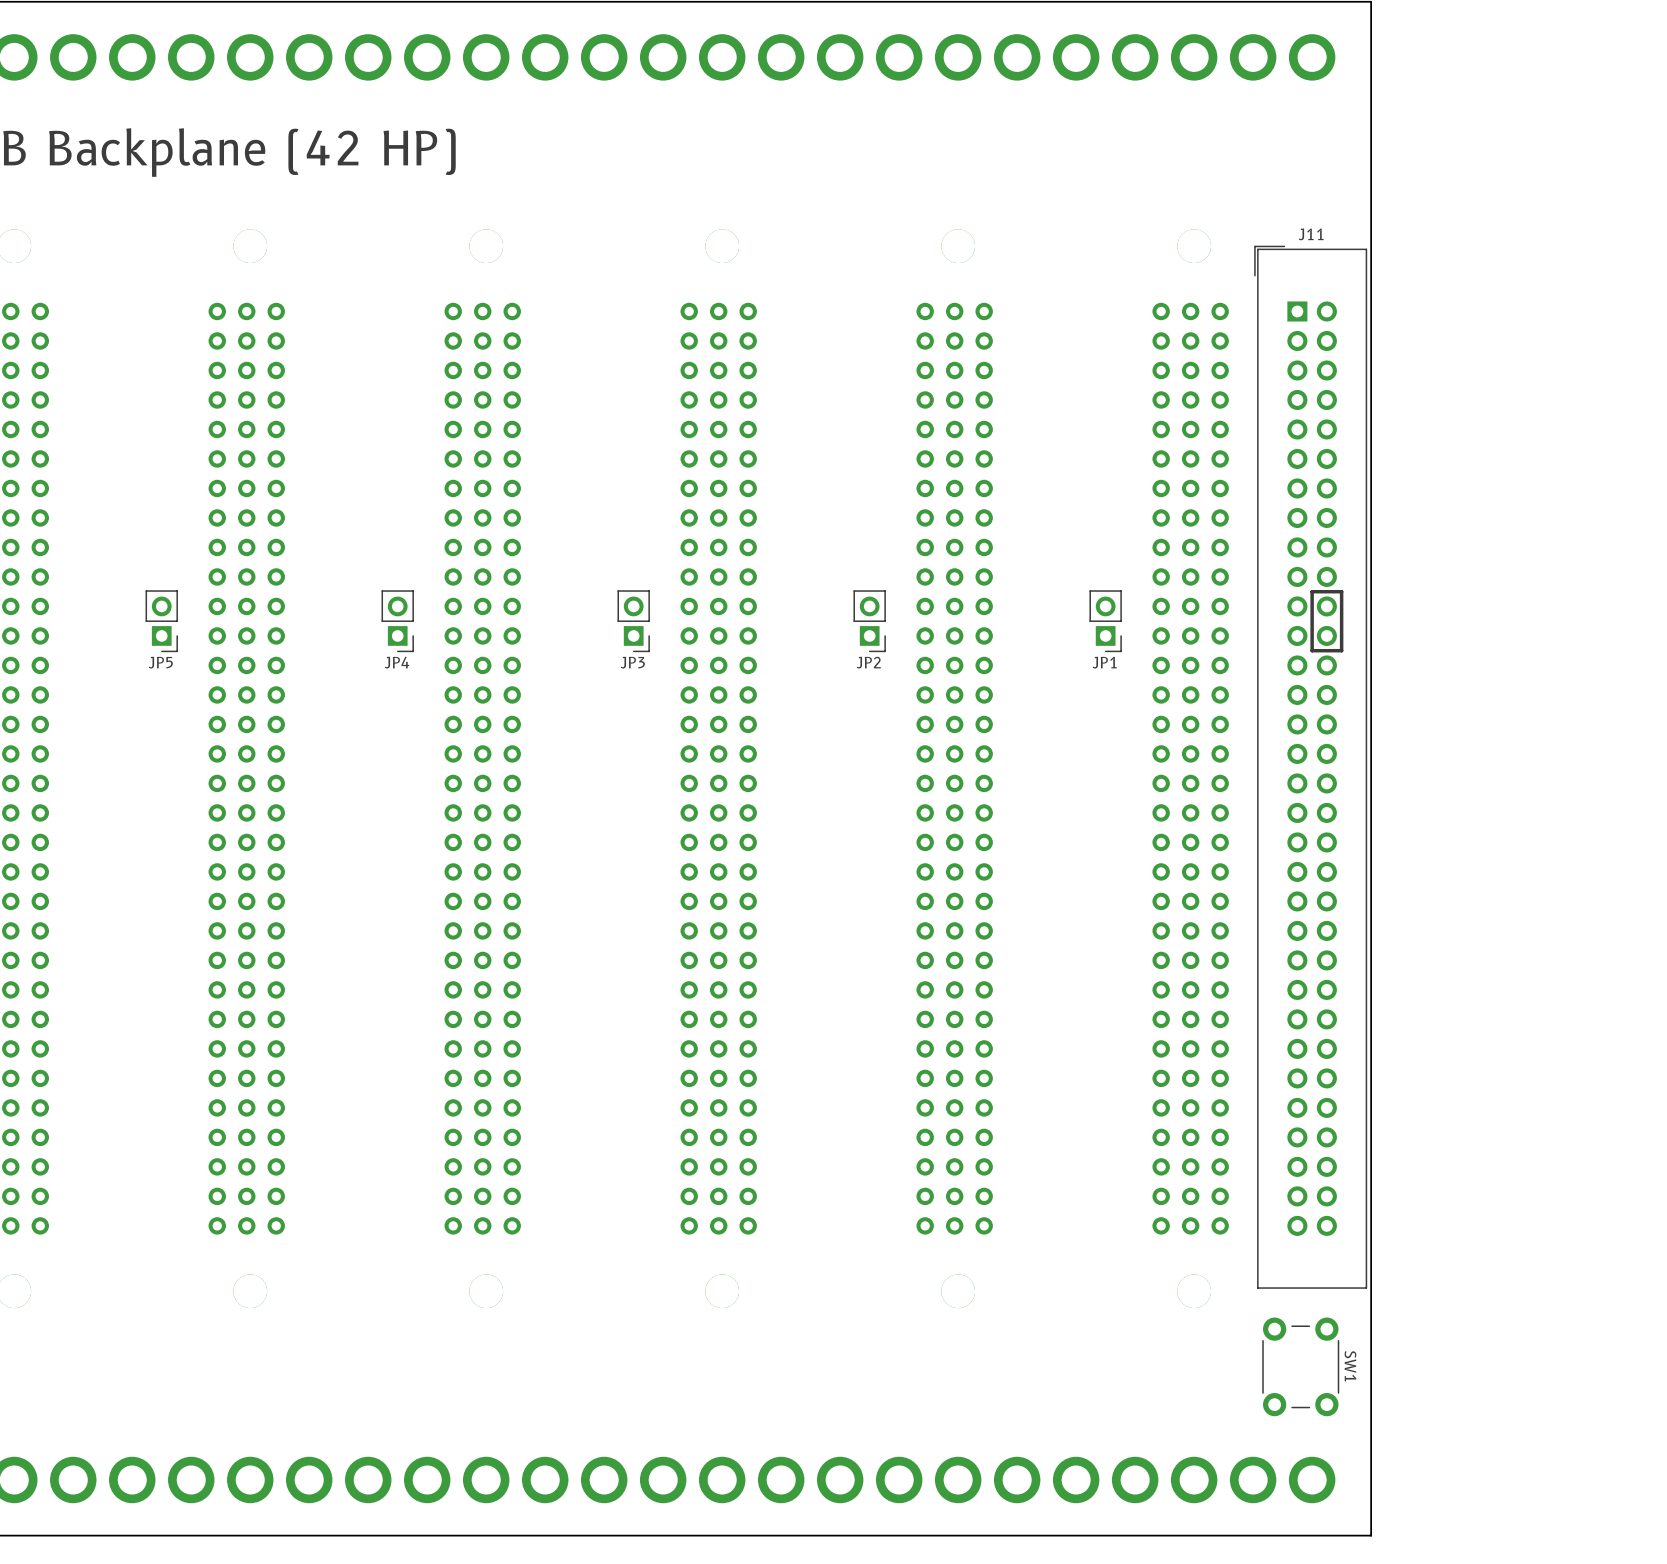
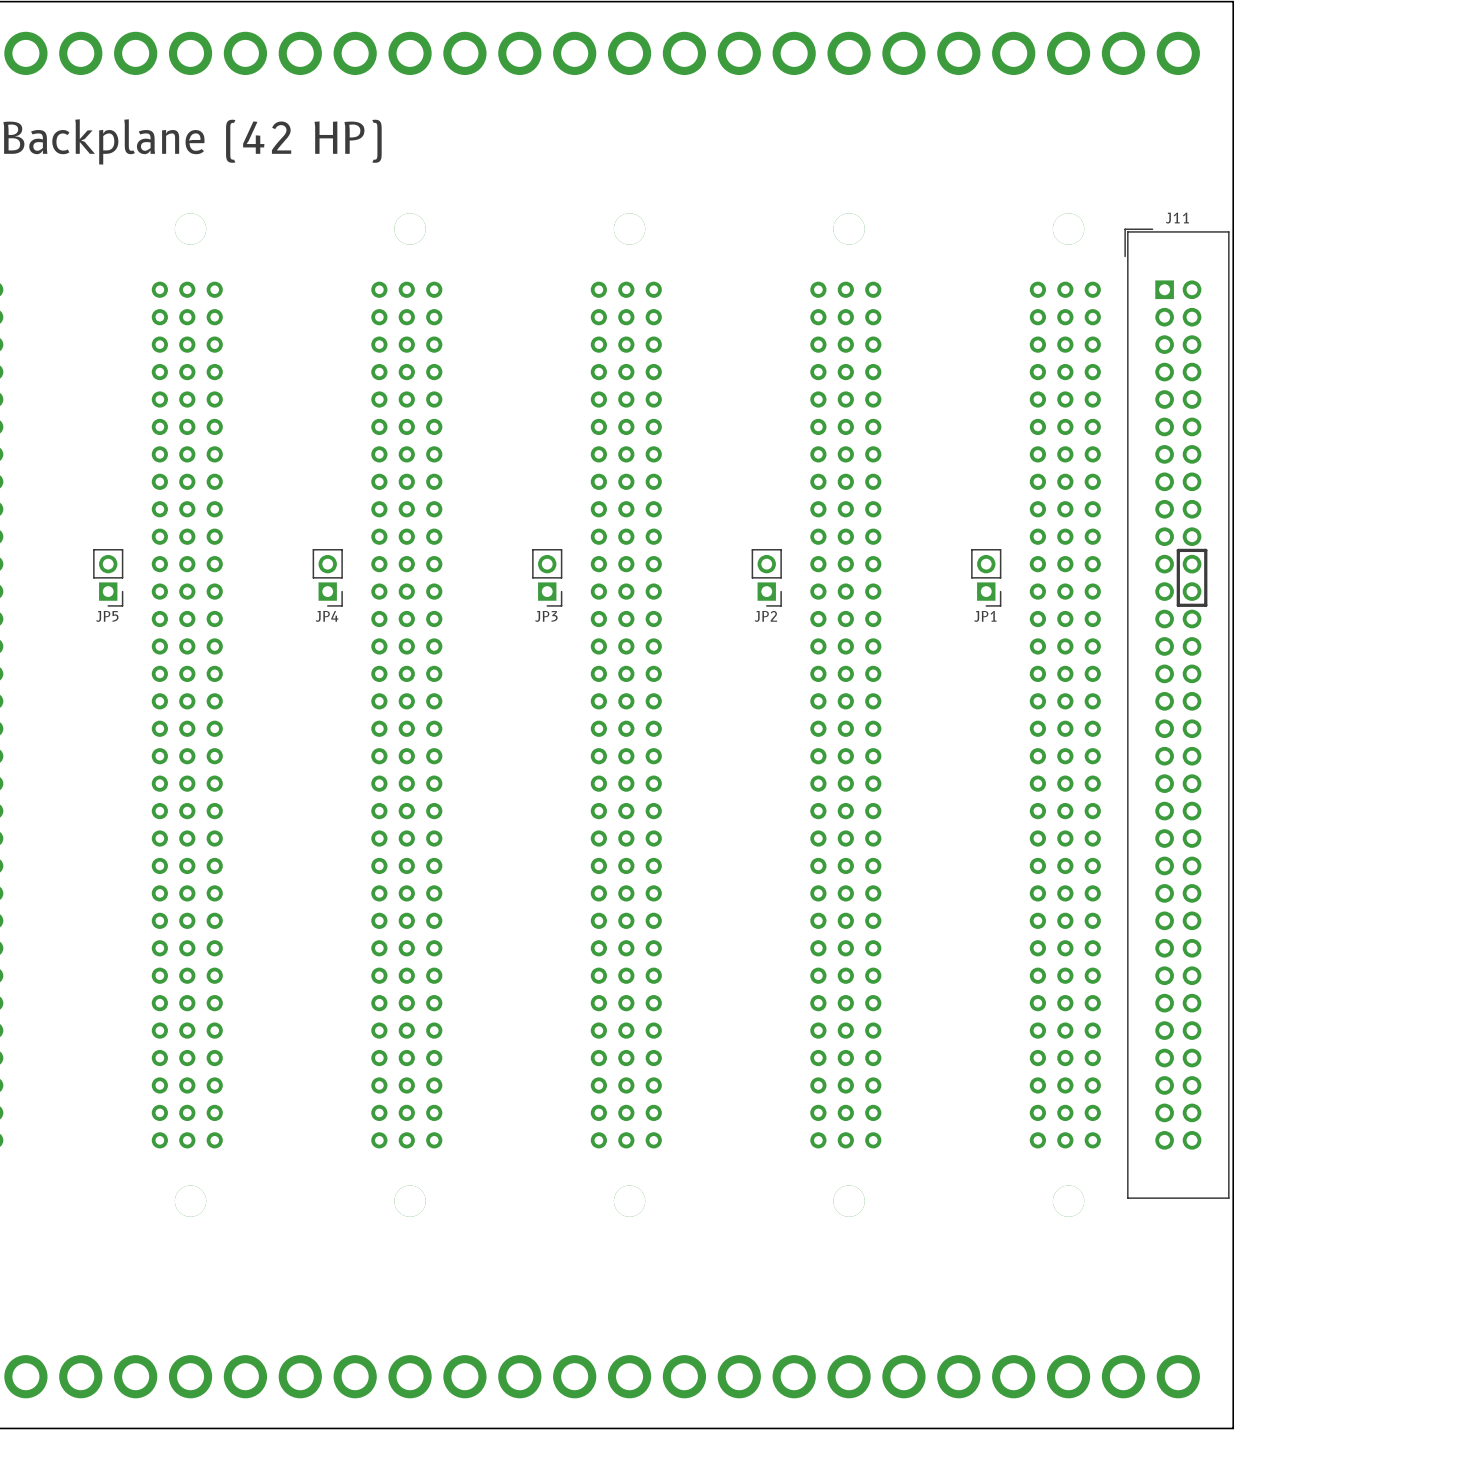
SW1: (1300, 1366) -> none

